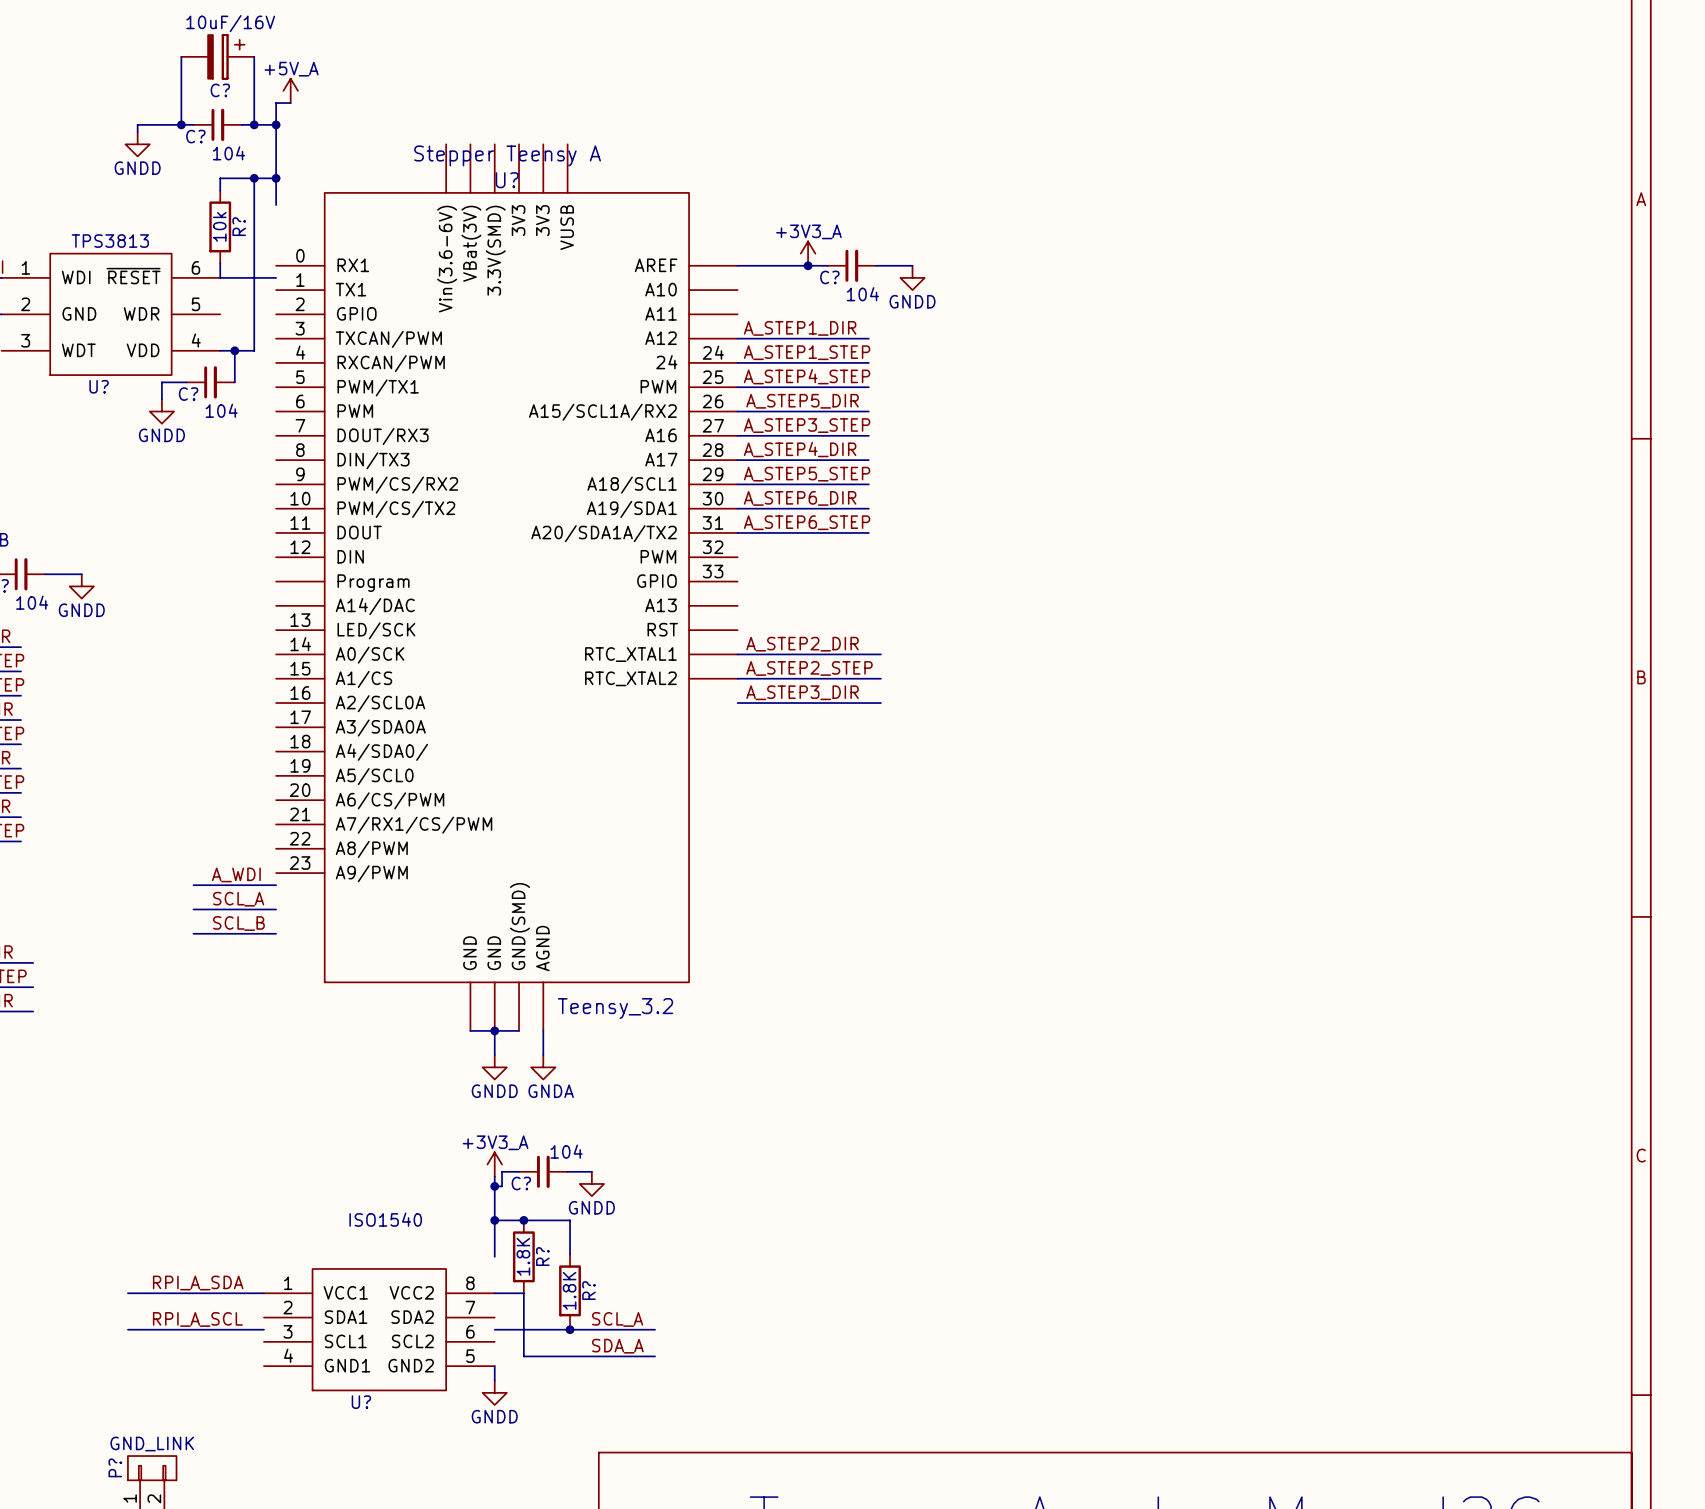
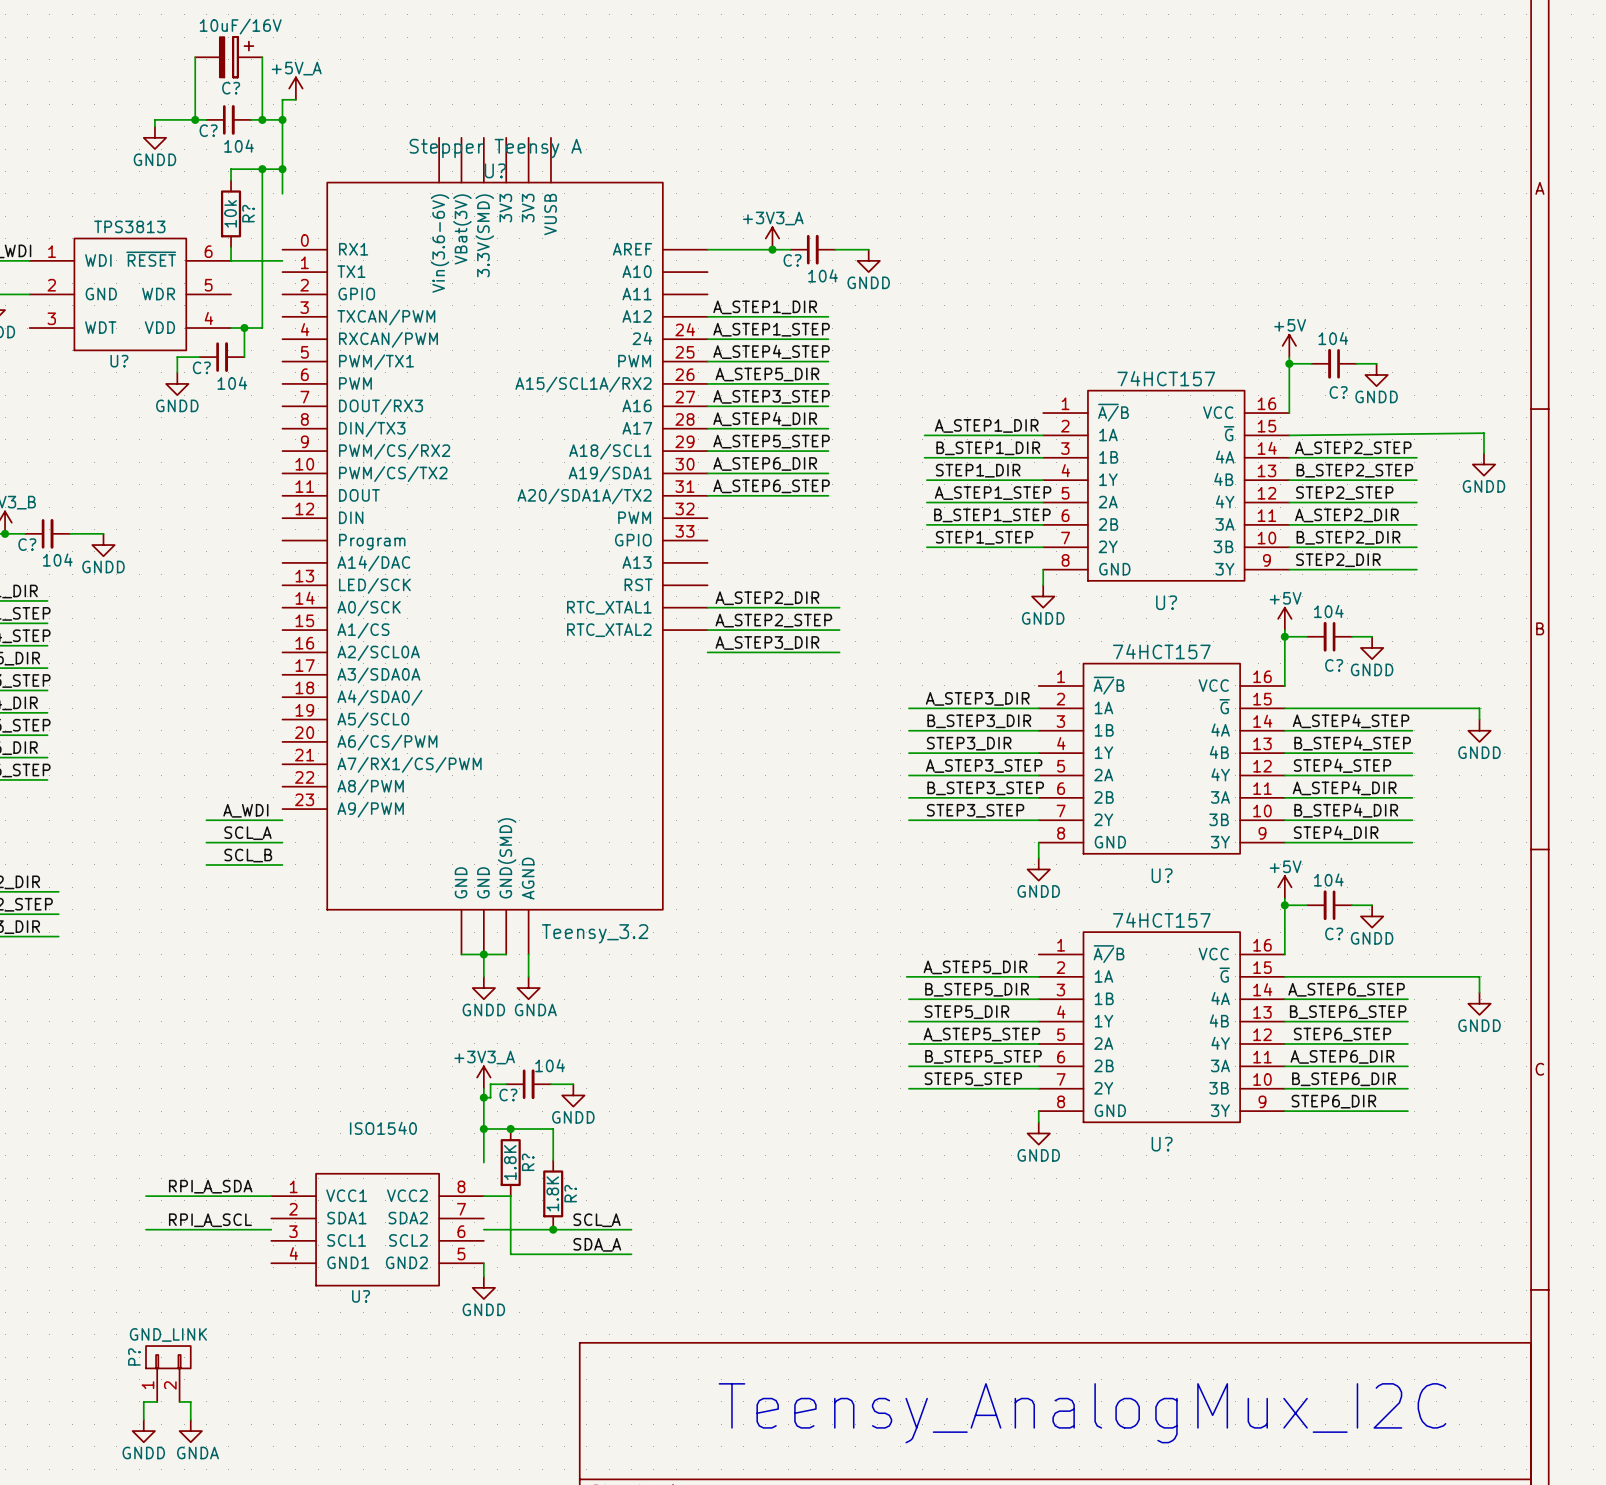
power symbol: none -> +5V (1289, 345)
wire: none -> (1289, 357) (1289, 413)
wire: none -> (1289, 363) (1311, 363)
junction: none -> (1289, 363)
C?: none -> 104 (1334, 363)
wire: none -> (1356, 363) (1376, 363)
power symbol: none -> GNDD (1376, 374)
label: none -> A_STEP1_DIR (986, 425)
wire: none -> (924, 435) (1043, 435)
wire: none -> (1289, 435) (1483, 433) (1483, 453)
label: none -> B_STEP1_DIR (988, 448)
label: none -> A_STEP2_STEP (1353, 448)
wire: none -> (924, 457) (1043, 457)
wire: none -> (1289, 457) (1416, 457)
power symbol: none -> GNDD (1483, 464)
label: none -> STEP1_DIR (978, 470)
label: none -> B_STEP2_STEP (1354, 470)
wire: none -> (926, 480) (1043, 480)
wire: none -> (1289, 480) (1416, 480)
U?: none -> 74HCT157 (1166, 485)
label: none -> A_STEP1_STEP (993, 493)
label: none -> STEP2_STEP (1344, 493)
wire: none -> (926, 502) (1043, 502)
wire: none -> (1289, 502) (1416, 502)
label: none -> B_STEP1_STEP (992, 515)
label: none -> A_STEP2_DIR (1346, 515)
wire: none -> (926, 524) (1043, 524)
wire: none -> (1289, 524) (1416, 524)
label: none -> STEP1_STEP (984, 537)
label: none -> B_STEP2_DIR (1348, 537)
wire: none -> (926, 547) (1043, 547)
wire: none -> (1289, 547) (1416, 547)
label: none -> STEP2_DIR (1338, 560)
wire: none -> (1043, 569) (1043, 585)
wire: none -> (1289, 569) (1416, 569)
power symbol: none -> GNDD (1043, 596)
power symbol: none -> +5V (1284, 618)
wire: none -> (1284, 630) (1284, 685)
wire: none -> (1284, 636) (1307, 636)
junction: none -> (1284, 636)
C?: none -> 104 (1329, 636)
wire: none -> (1351, 636) (1372, 636)
power symbol: none -> GNDD (1372, 647)
label: none -> A_STEP3_DIR (977, 698)
wire: none -> (908, 708) (1038, 708)
wire: none -> (1284, 708) (1479, 708) (1479, 719)
label: none -> B_STEP3_DIR (979, 721)
label: none -> A_STEP4_STEP (1351, 721)
wire: none -> (908, 730) (1038, 730)
wire: none -> (1284, 730) (1412, 730)
power symbol: none -> GNDD (1479, 730)
label: none -> B_STEP4_STEP (1352, 743)
label: none -> STEP3_DIR (969, 743)
wire: none -> (908, 753) (1038, 753)
wire: none -> (1284, 753) (1412, 753)
U?: none -> 74HCT157 (1161, 758)
label: none -> A_STEP3_STEP (984, 766)
label: none -> STEP4_STEP (1342, 765)
wire: none -> (908, 775) (1038, 775)
wire: none -> (1284, 775) (1412, 775)
label: none -> B_STEP3_STEP (985, 788)
label: none -> A_STEP4_DIR (1344, 788)
wire: none -> (908, 797) (1038, 797)
wire: none -> (1284, 797) (1412, 797)
label: none -> STEP3_STEP (975, 810)
label: none -> B_STEP4_DIR (1346, 810)
wire: none -> (908, 820) (1038, 820)
wire: none -> (1284, 820) (1412, 820)
label: none -> STEP4_DIR (1336, 832)
wire: none -> (1038, 842) (1038, 858)
wire: none -> (1284, 842) (1412, 842)
power symbol: none -> GNDD (1038, 869)
power symbol: none -> +5V (1284, 887)
wire: none -> (1284, 898) (1284, 954)
wire: none -> (1284, 905) (1307, 905)
junction: none -> (1284, 905)
C?: none -> 104 (1329, 905)
wire: none -> (1351, 905) (1372, 905)
power symbol: none -> GNDD (1372, 916)
label: none -> A_STEP5_DIR (975, 967)
wire: none -> (906, 976) (1038, 976)
wire: none -> (1284, 976) (1479, 976) (1479, 992)
label: none -> B_STEP5_DIR (977, 989)
label: none -> A_STEP6_STEP (1346, 989)
wire: none -> (908, 999) (1038, 999)
wire: none -> (1284, 999) (1407, 999)
power symbol: none -> GNDD (1479, 1003)
label: none -> STEP5_DIR (966, 1012)
label: none -> B_STEP6_STEP (1348, 1012)
wire: none -> (908, 1021) (1038, 1021)
wire: none -> (1284, 1021) (1407, 1021)
U?: none -> 74HCT157 (1161, 1027)
label: none -> A_STEP5_STEP (981, 1034)
label: none -> STEP6_STEP (1342, 1034)
wire: none -> (908, 1043) (1038, 1043)
wire: none -> (1284, 1043) (1407, 1043)
label: none -> B_STEP5_STEP (983, 1056)
label: none -> A_STEP6_DIR (1342, 1056)
wire: none -> (908, 1066) (1038, 1066)
wire: none -> (1284, 1066) (1407, 1066)
label: none -> STEP5_STEP (973, 1079)
label: none -> B_STEP6_DIR (1344, 1079)
wire: none -> (908, 1088) (1038, 1088)
wire: none -> (1284, 1088) (1407, 1088)
label: none -> STEP6_DIR (1333, 1101)
wire: none -> (1038, 1111) (1038, 1122)
wire: none -> (1284, 1111) (1407, 1111)
power symbol: none -> GNDD (1038, 1133)

